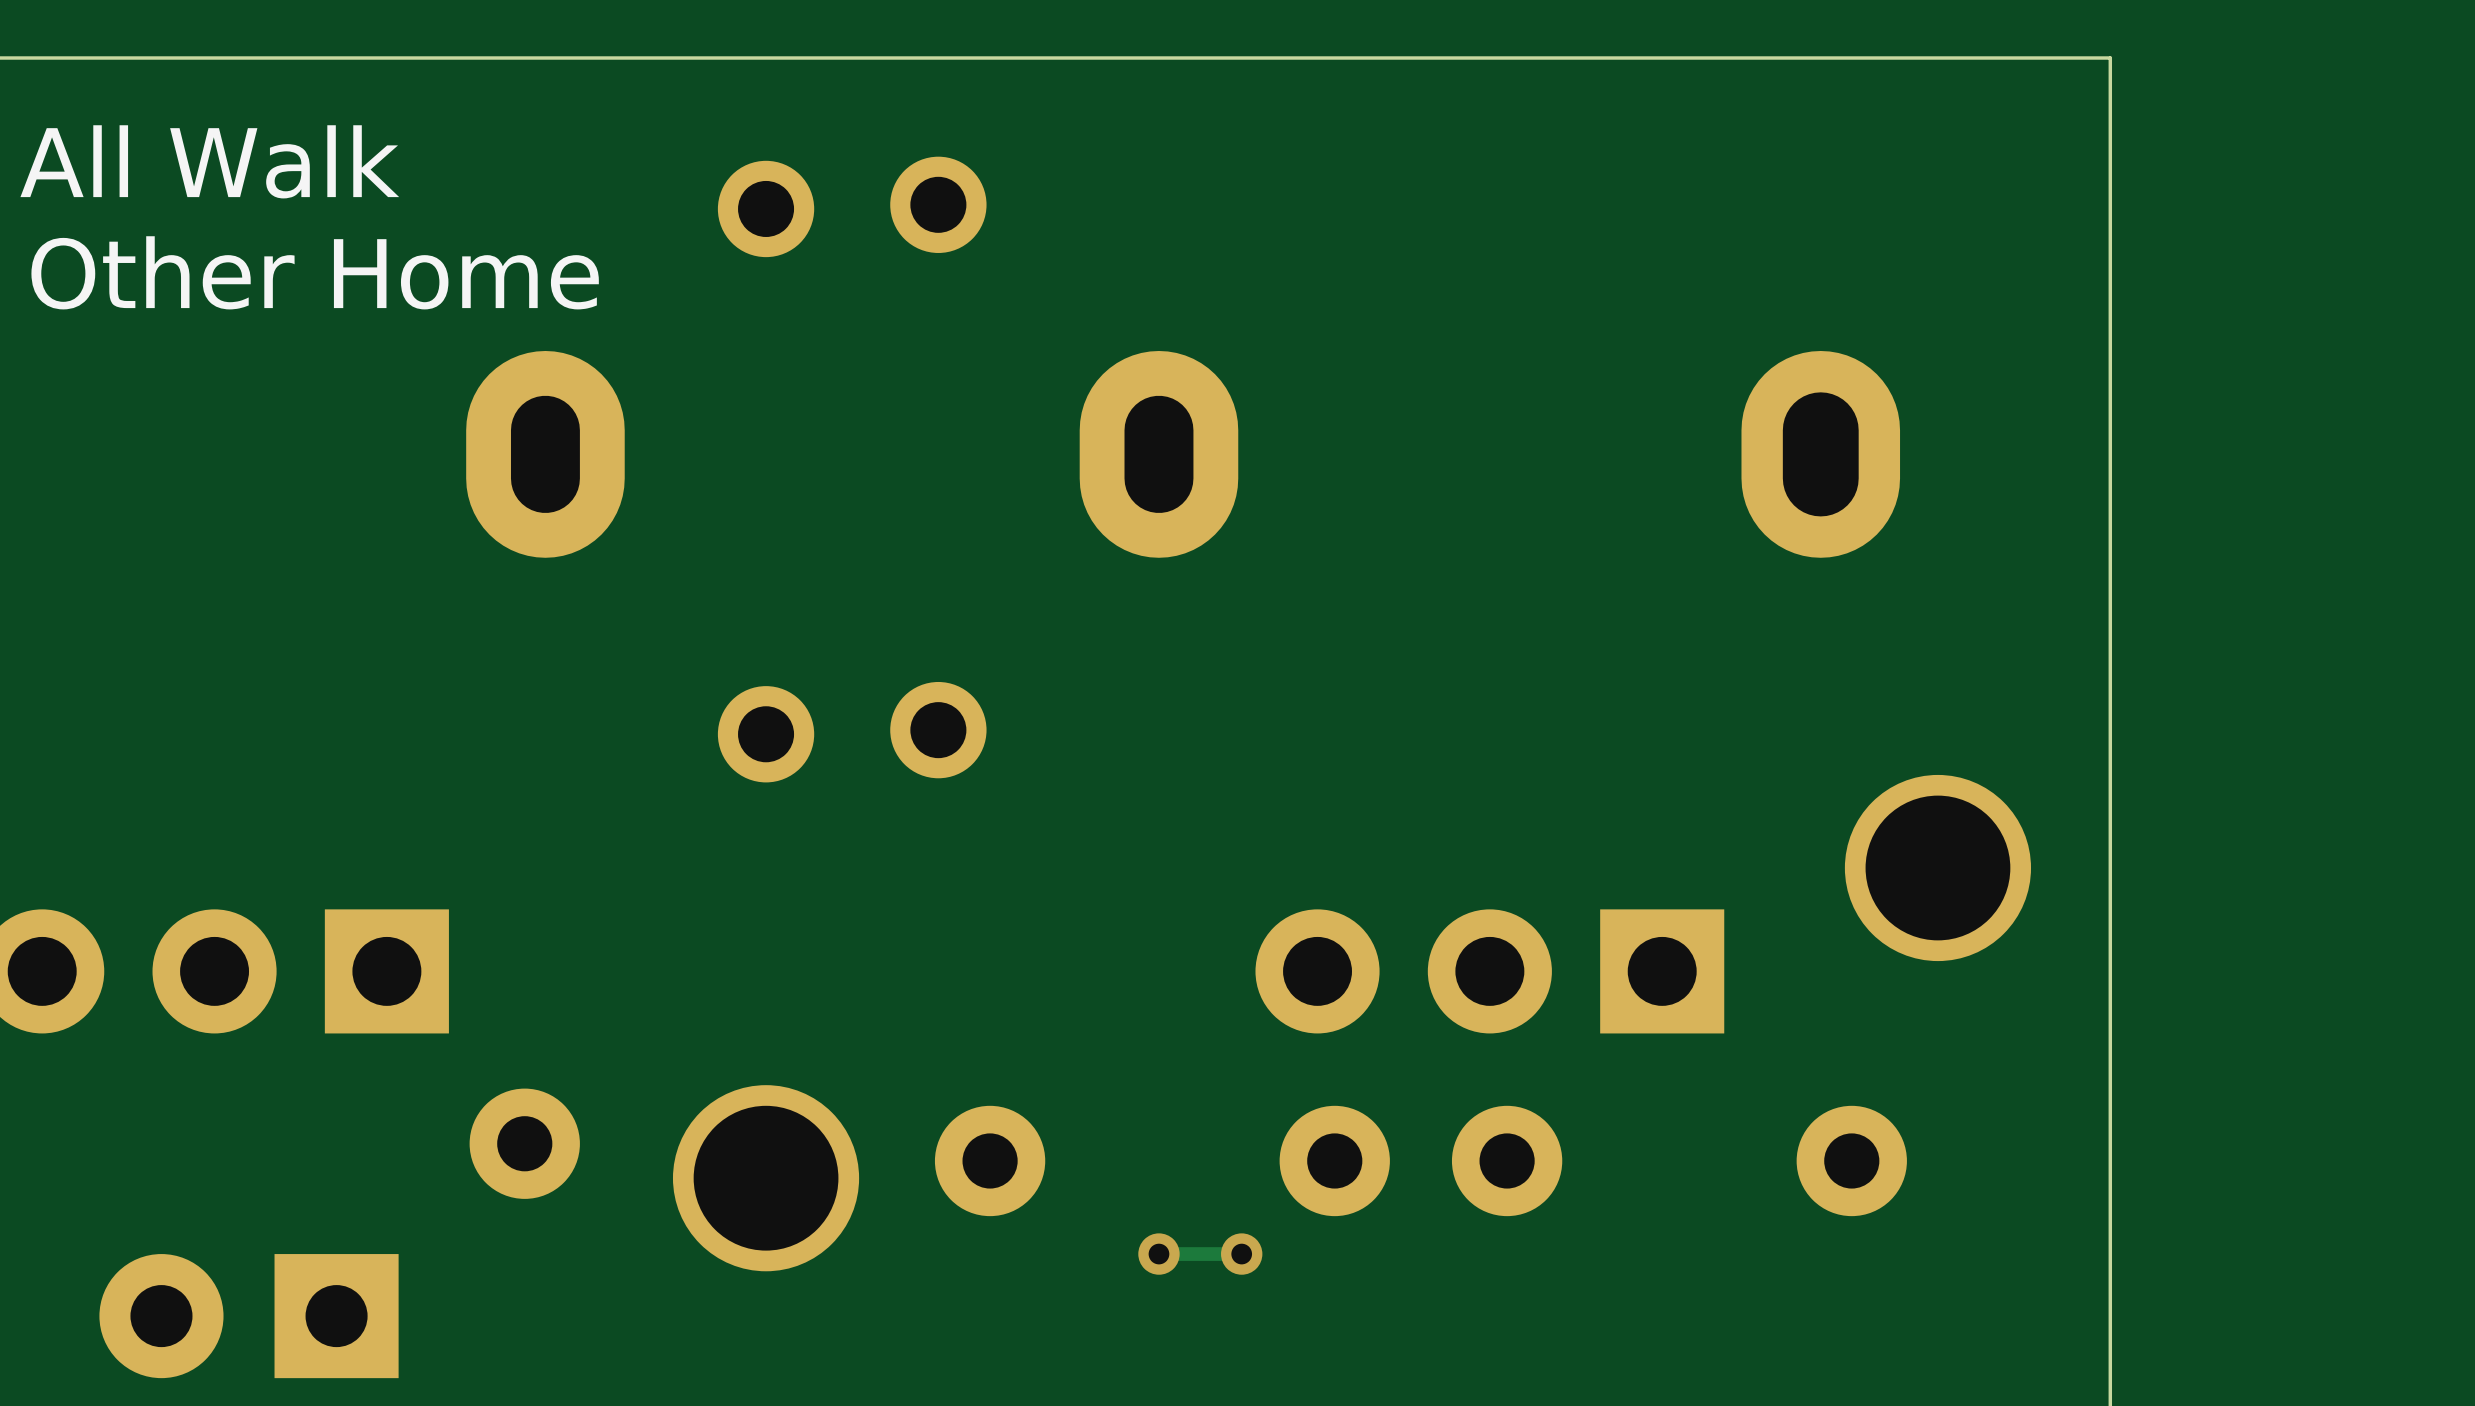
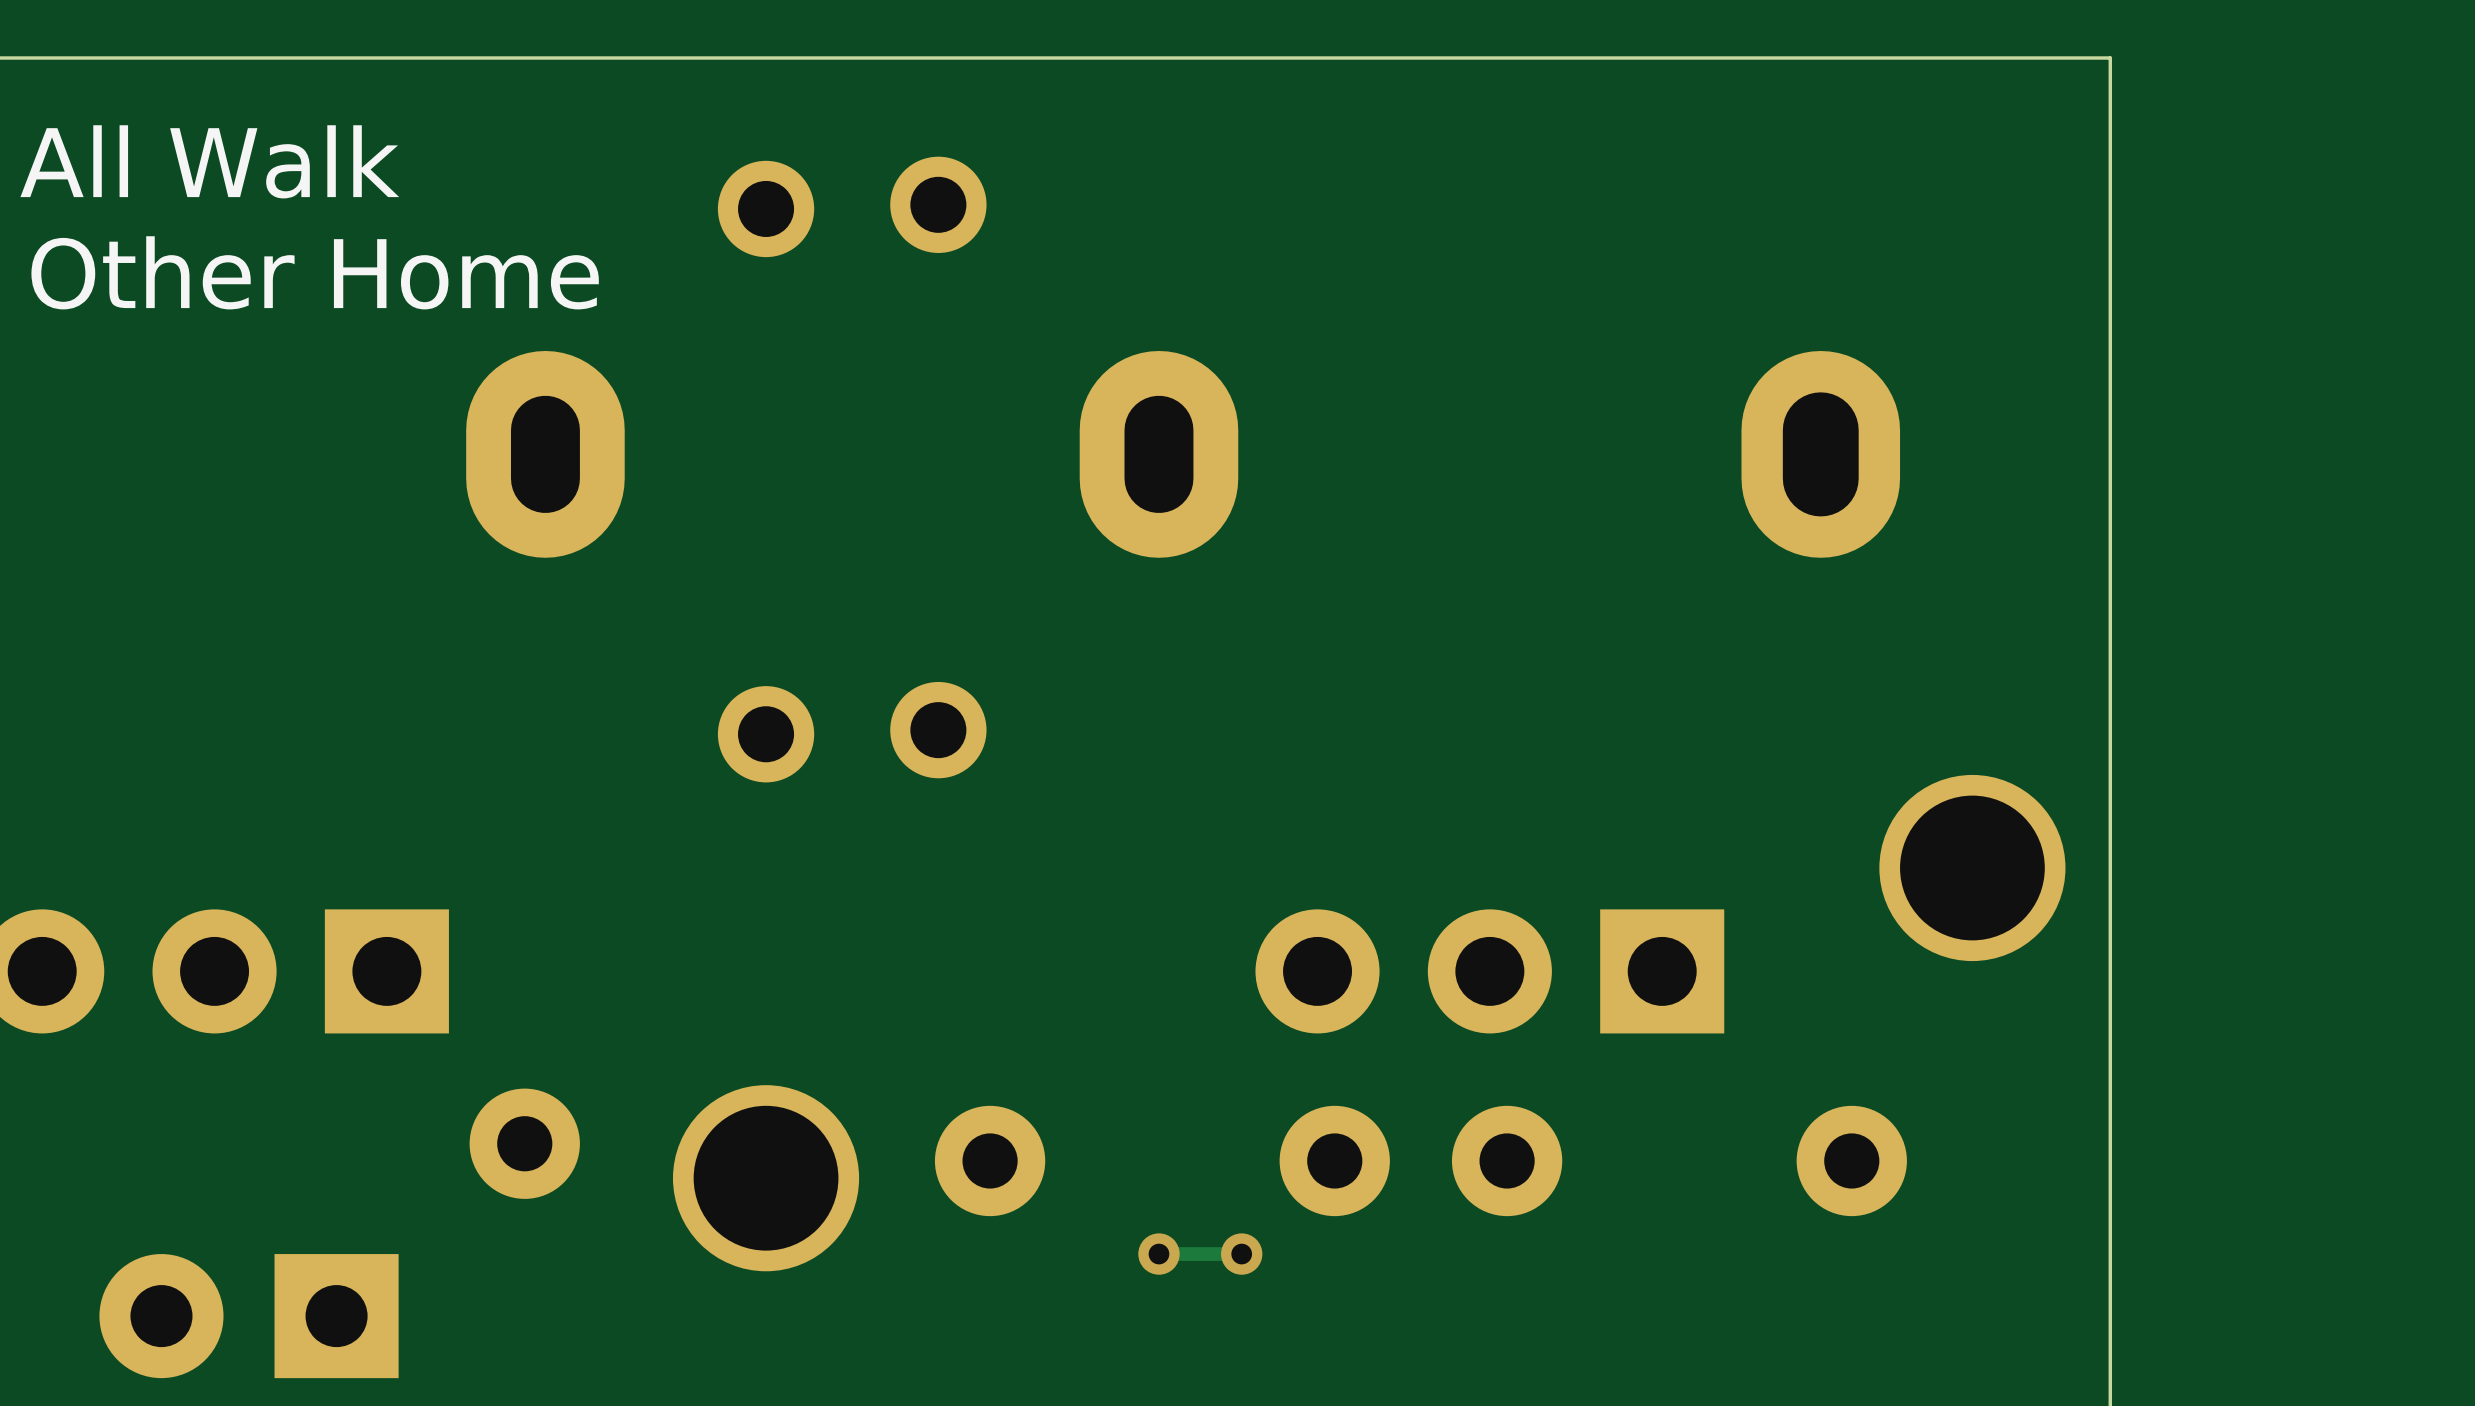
part position: (1937, 868) -> (1972, 868)

